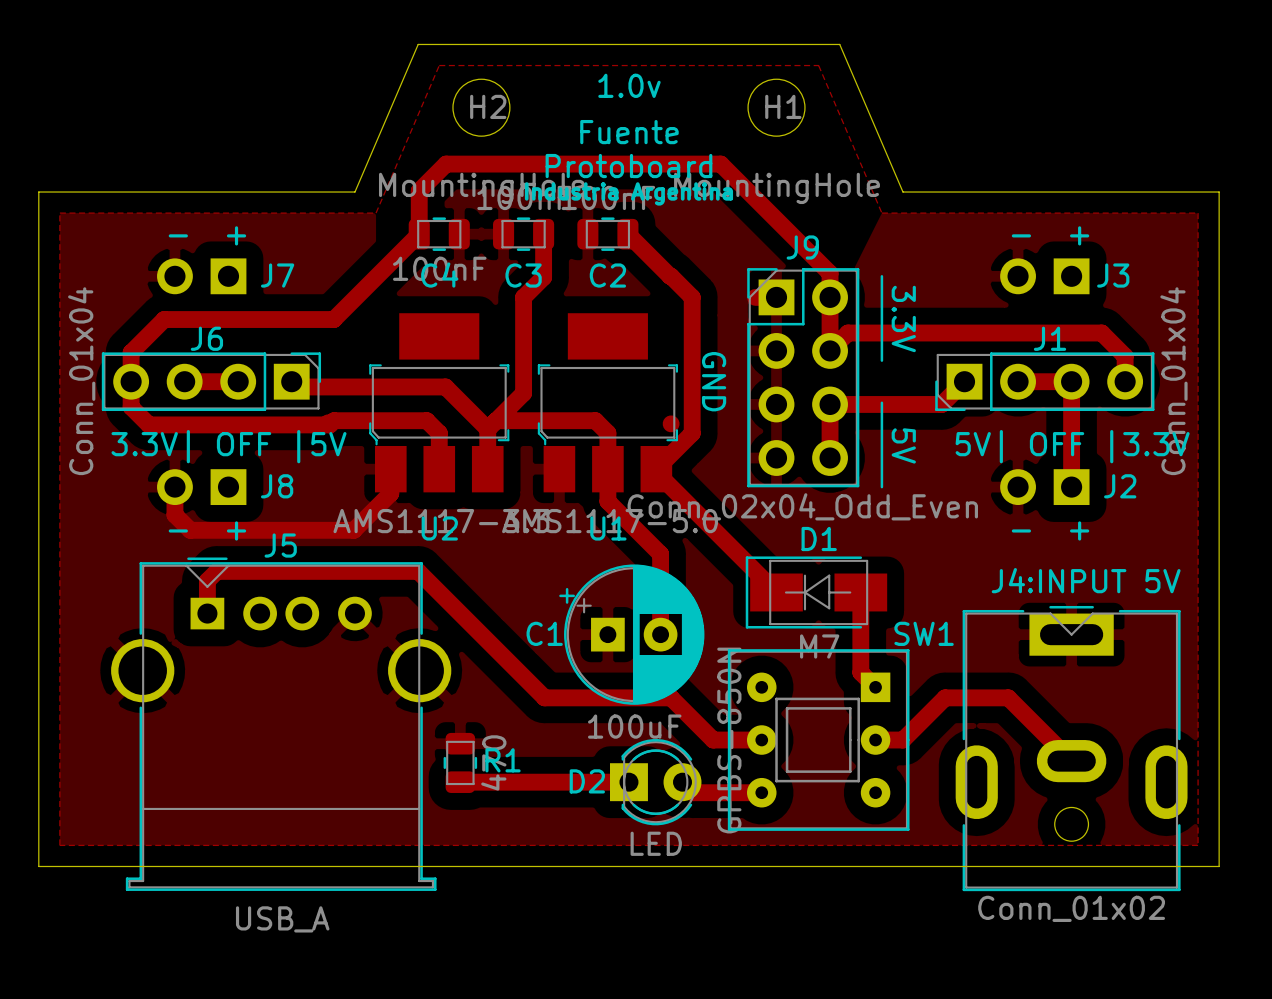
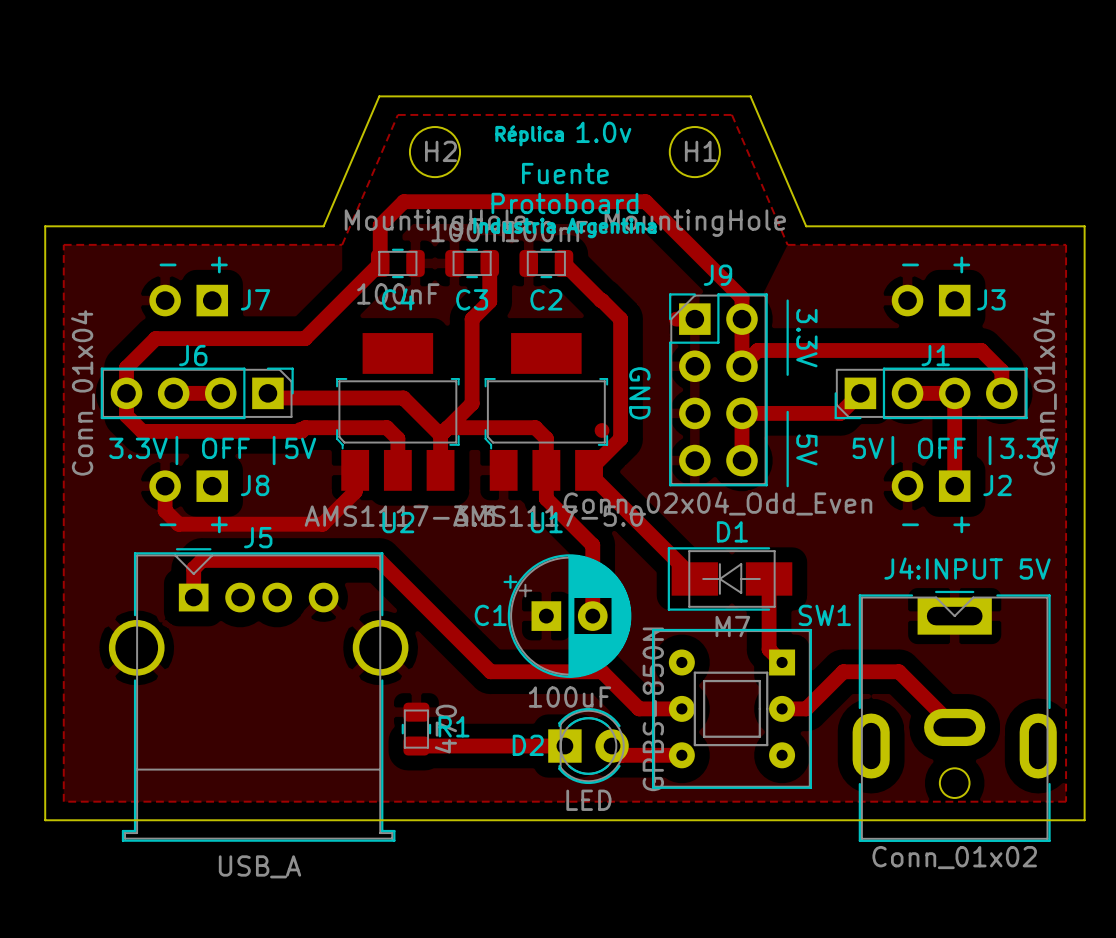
text position: 1.0v (629, 85) -> 1.0v (603, 132)
text: none -> Réplica (529, 135)

